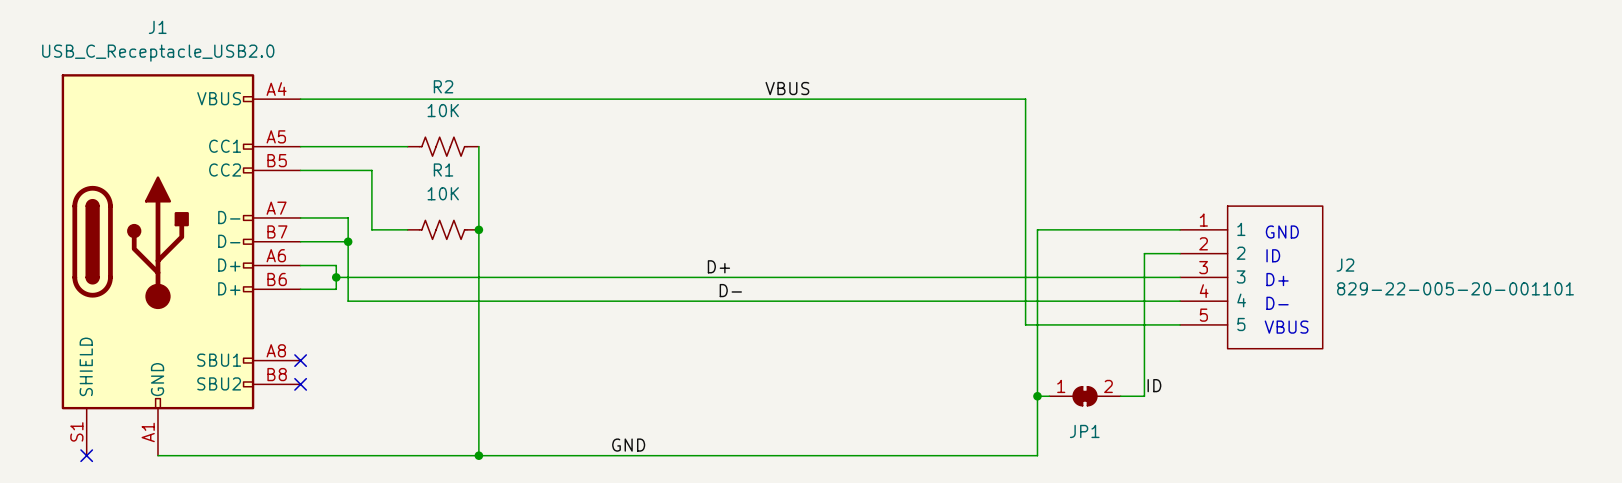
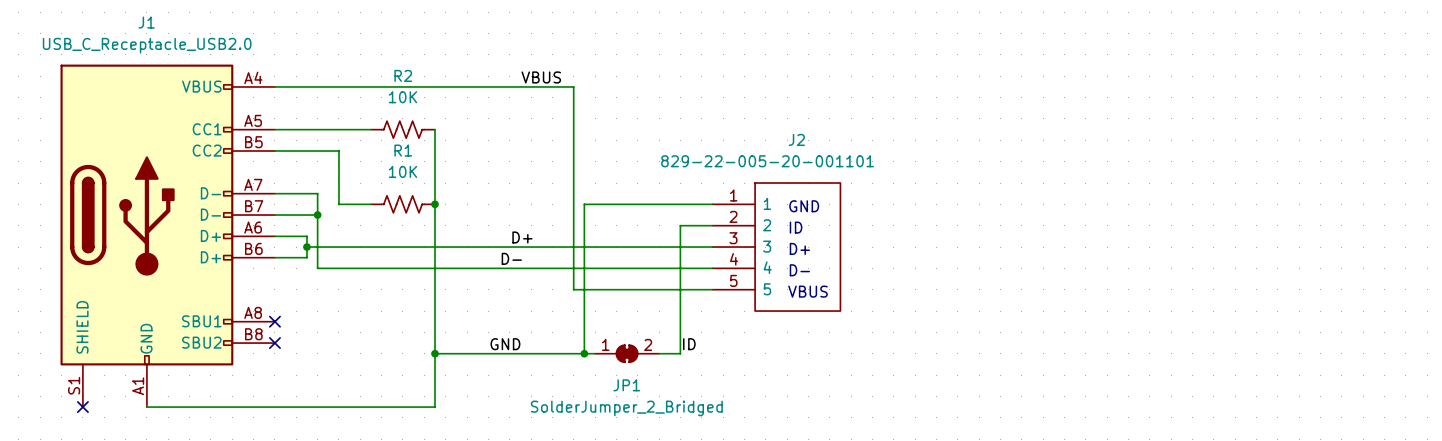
label position: VBUS (787, 88) -> VBUS (541, 77)
wire: (633, 99) (1025, 99) (1025, 324) (1180, 324) -> (573, 86) (573, 289) (712, 289)
wire: none -> (712, 204) (584, 204) (584, 353)
wire: (1180, 229) (1037, 229) (1037, 455) (478, 455) -> none
text: none -> GND (804, 206)
text: GND (1282, 232) -> none
wire: none -> (712, 225) (680, 225) (680, 353) (659, 353)
wire: (1180, 253) (1144, 253) (1144, 396) (1120, 396) -> none
text: none -> ID (796, 227)
text: ID (1273, 255) -> none
J2 name position: J2 (1345, 265) -> J2 (796, 139)
label position: D+ (718, 266) -> D+ (522, 237)
wire: (787, 277) (1180, 277) -> none
J2 position: (1251, 277) -> (776, 247)
text: none -> D+ (799, 248)
text: D+ (1277, 279) -> none
J2 value position: 829-22-005-20-001101 (1455, 288) -> 829-22-005-20-001101 (767, 161)
label position: D- (730, 290) -> D- (511, 258)
wire: (787, 301) (1180, 301) -> none
text: none -> D- (799, 270)
text: D- (1277, 303) -> none
text: none -> VBUS (808, 291)
text: VBUS (1286, 327) -> none
label: none -> ID (689, 344)
label: ID (1154, 385) -> none
wire: none -> (435, 353) (595, 353)
junction: none -> (435, 353)
junction: none -> (584, 353)
wire: (1037, 396) (1049, 396) -> none
junction: (1037, 396) -> none
JP1 position: (1085, 396) -> (627, 353)
label position: GND (628, 445) -> GND (505, 344)
junction: (478, 455) -> none
JP1 value: none -> SolderJumper_2_Bridged (626, 408)

